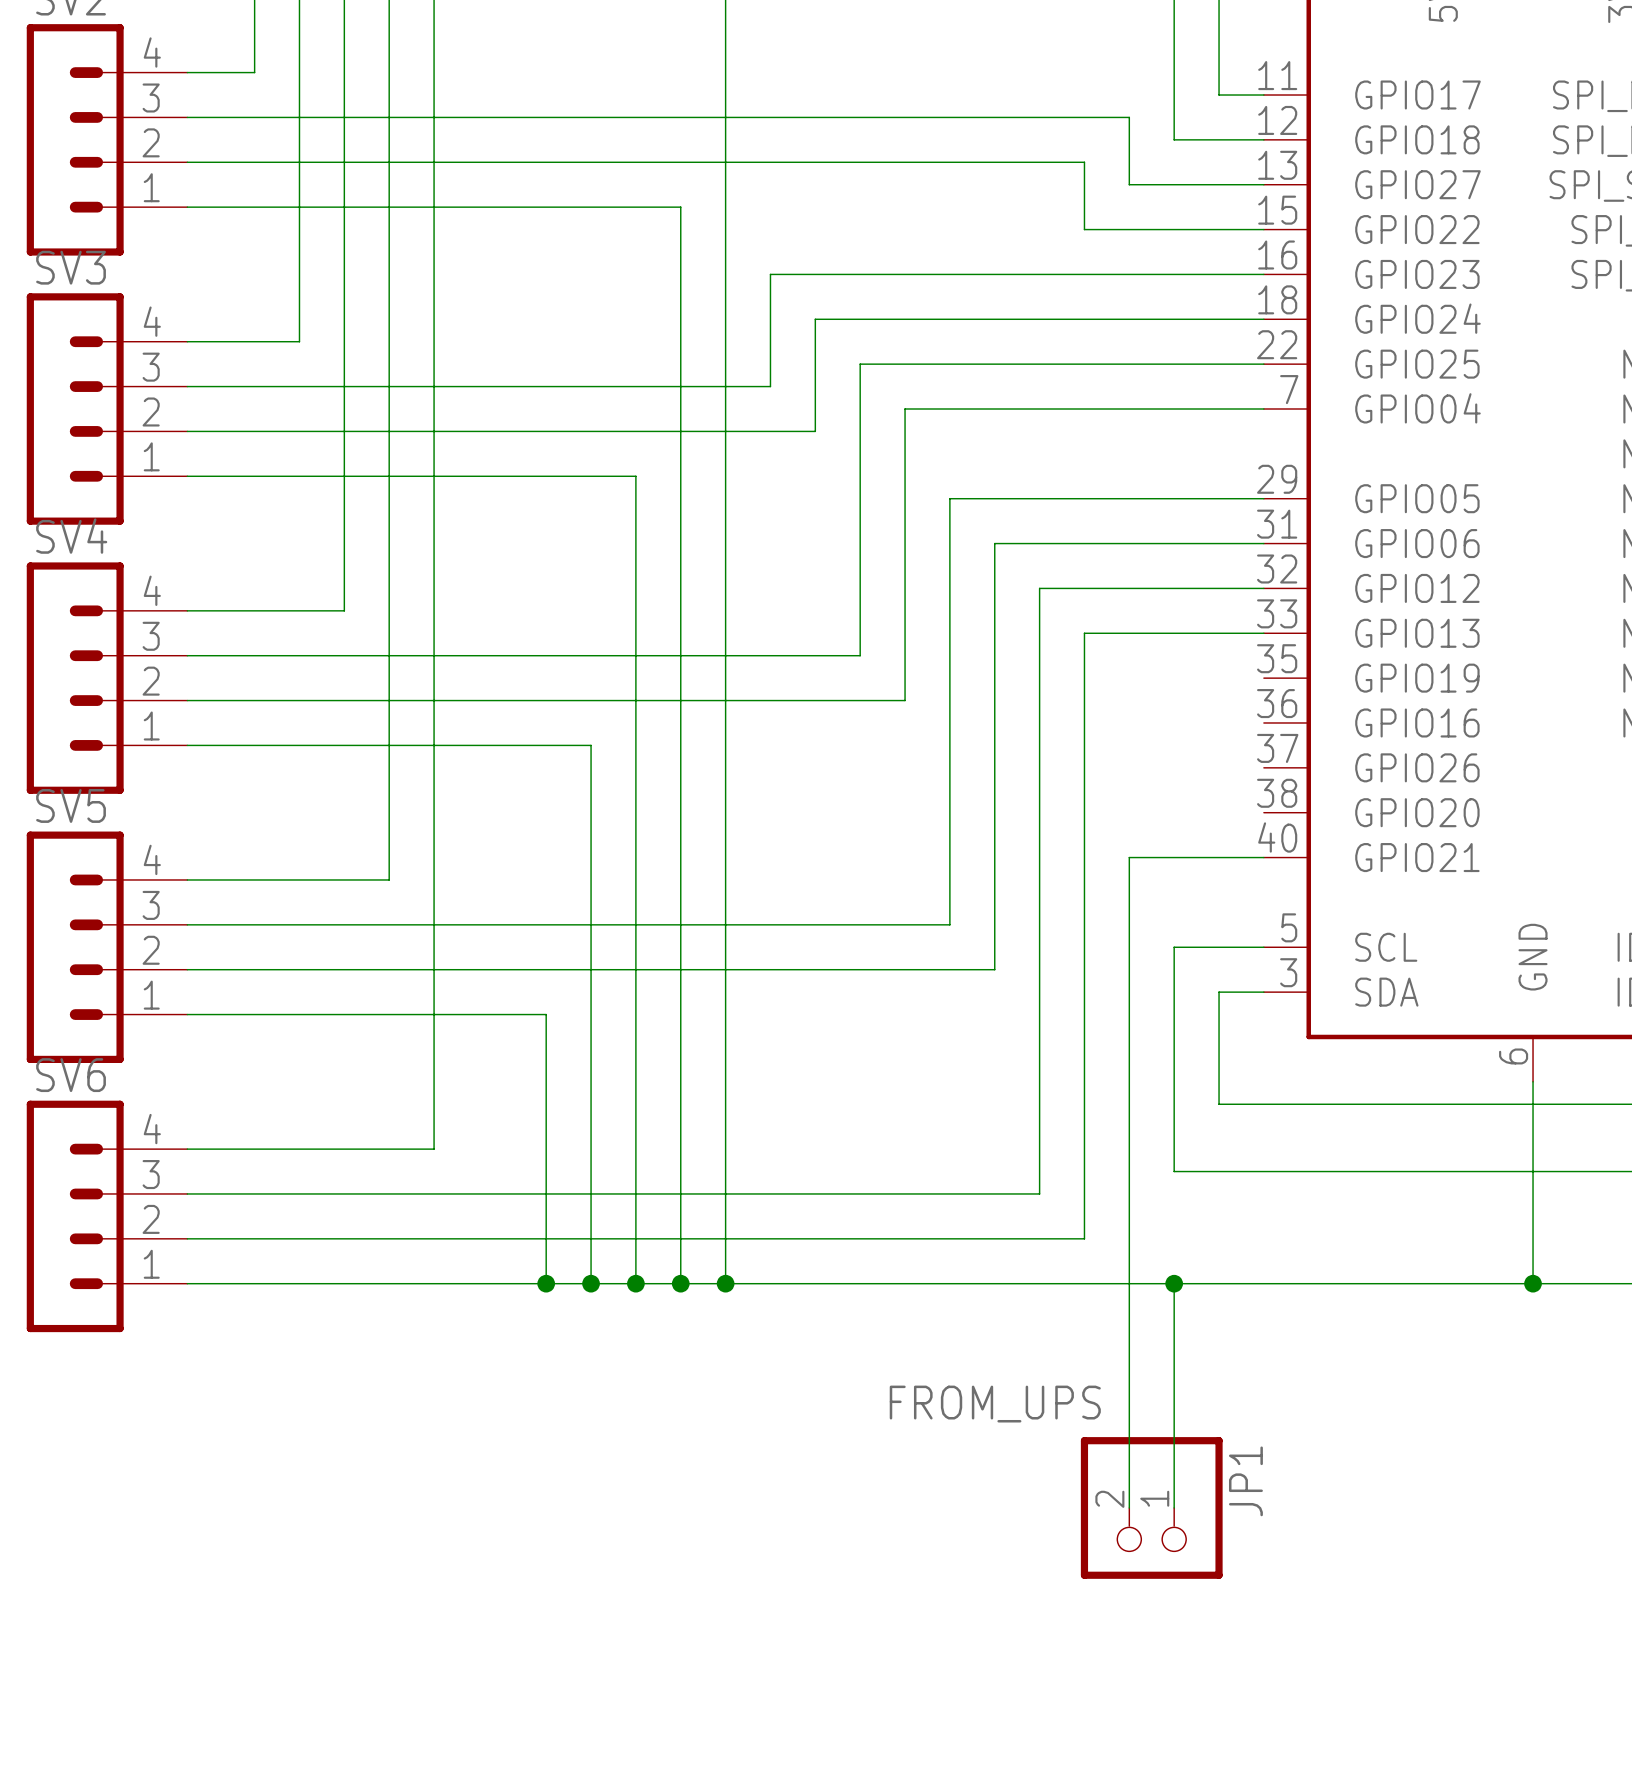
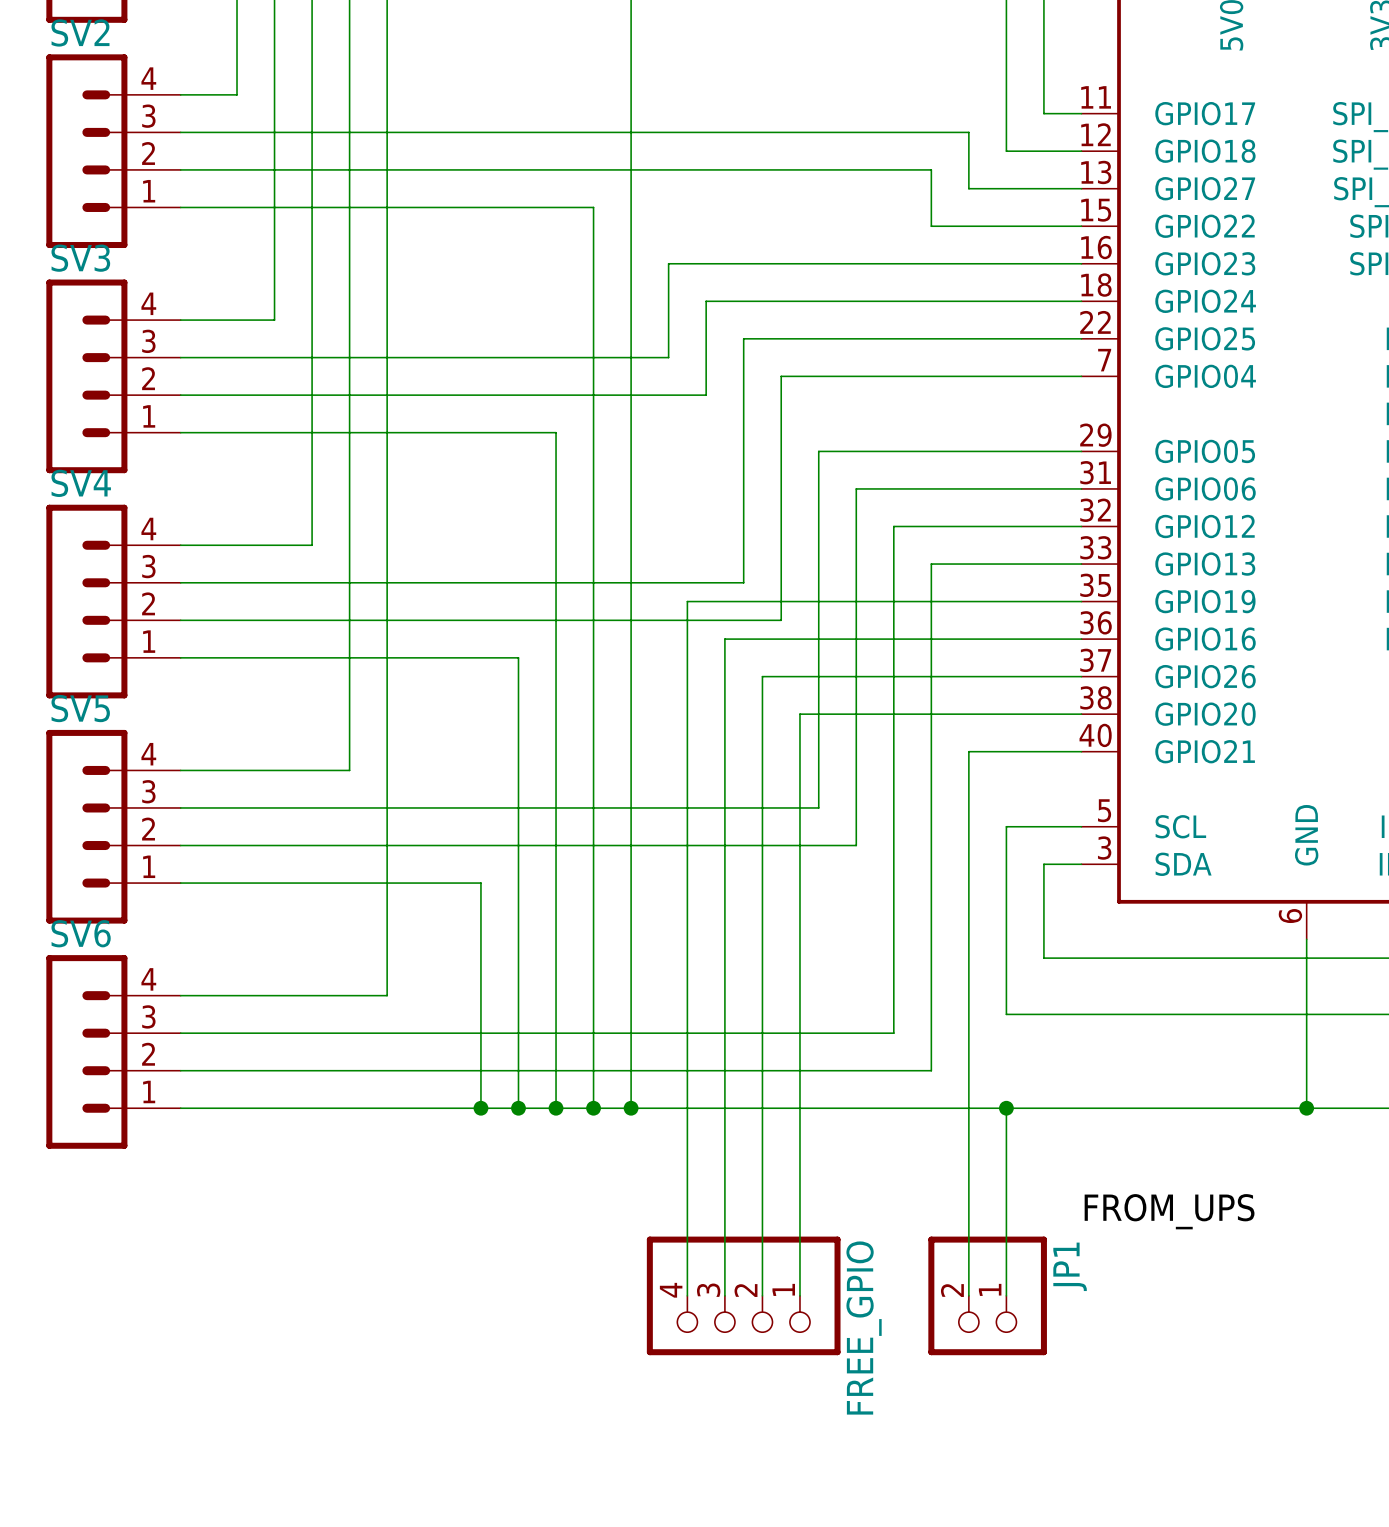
wire: none -> (1081, 601) (687, 601) (687, 1295)
wire: none -> (1081, 639) (724, 639) (724, 1295)
wire: none -> (1081, 676) (762, 676) (762, 1295)
wire: none -> (1081, 714) (799, 714) (799, 1295)
label position: FROM_UPS (995, 1404) -> FROM_UPS (1169, 1211)
FREE_GPIO: none -> (743, 1295)

